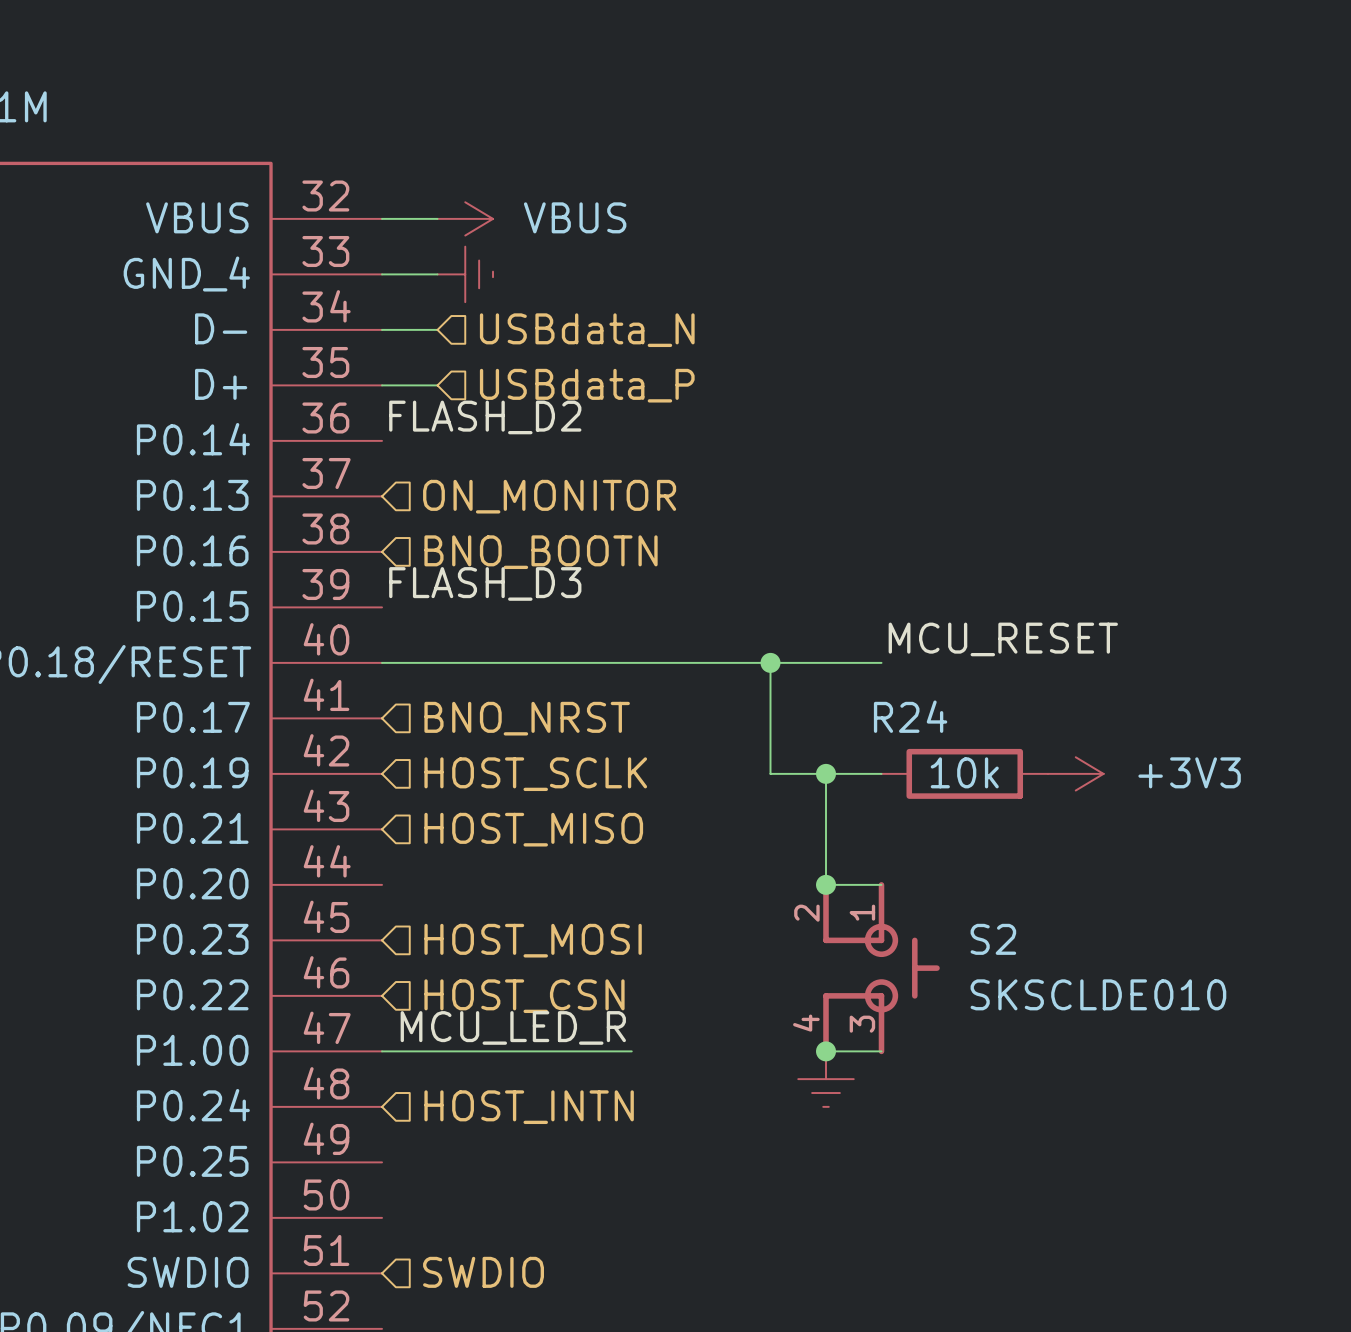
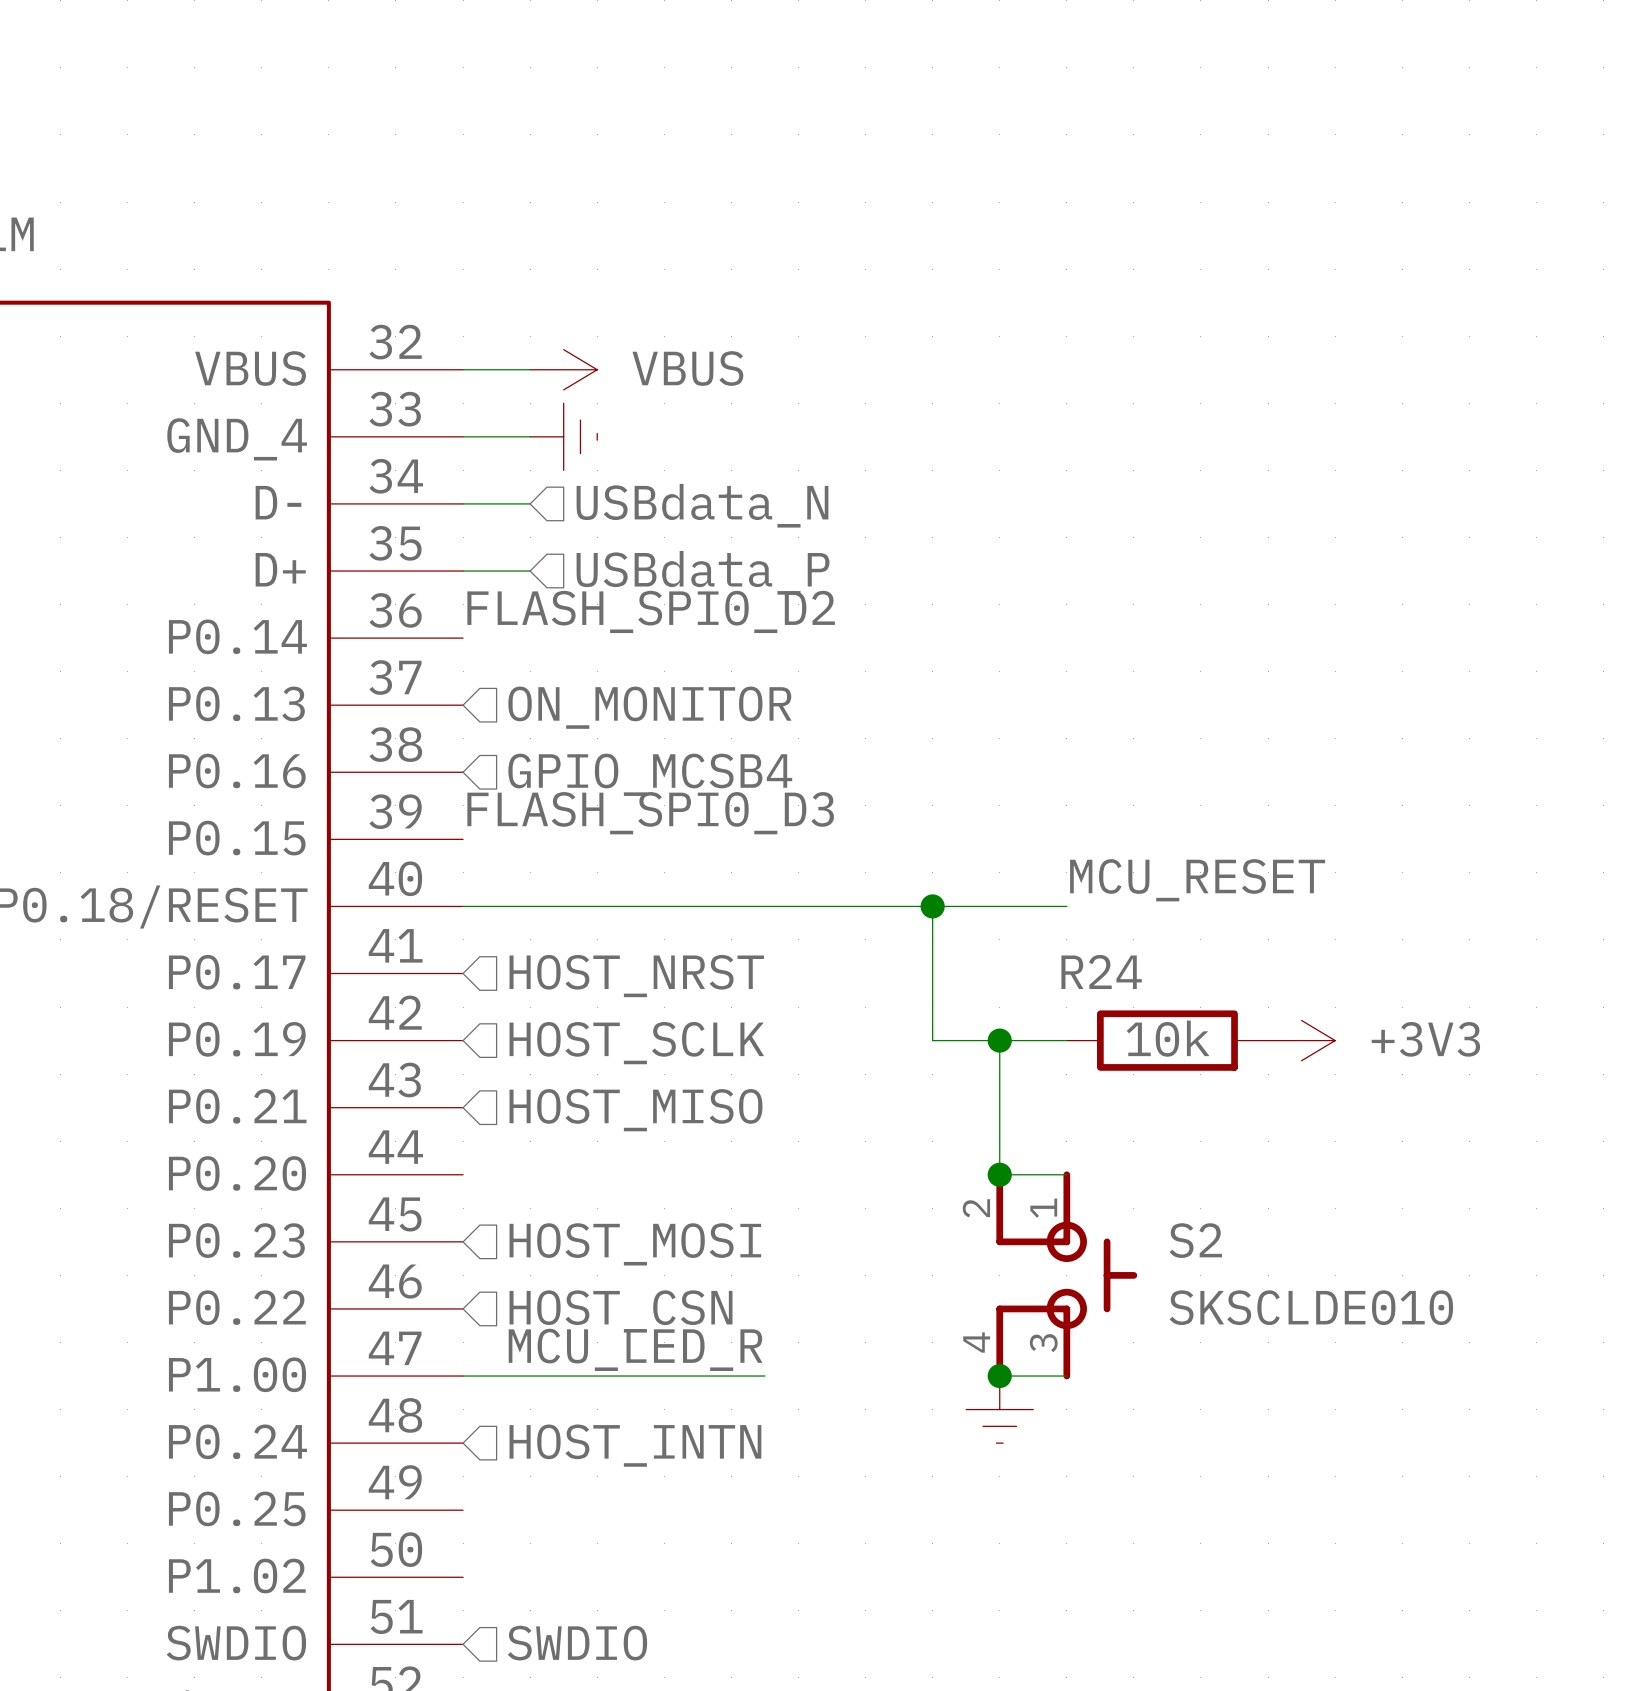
label: FLASH_D2 (485, 417) -> FLASH_SPI0_D2 (651, 611)
hierarchical label: BNO_BOOTN (541, 552) -> GPIO_MCSB4 (650, 774)
label: FLASH_D3 (485, 583) -> FLASH_SPI0_D3 (650, 813)
hierarchical label: BNO_NRST (527, 718) -> HOST_NRST (636, 976)

